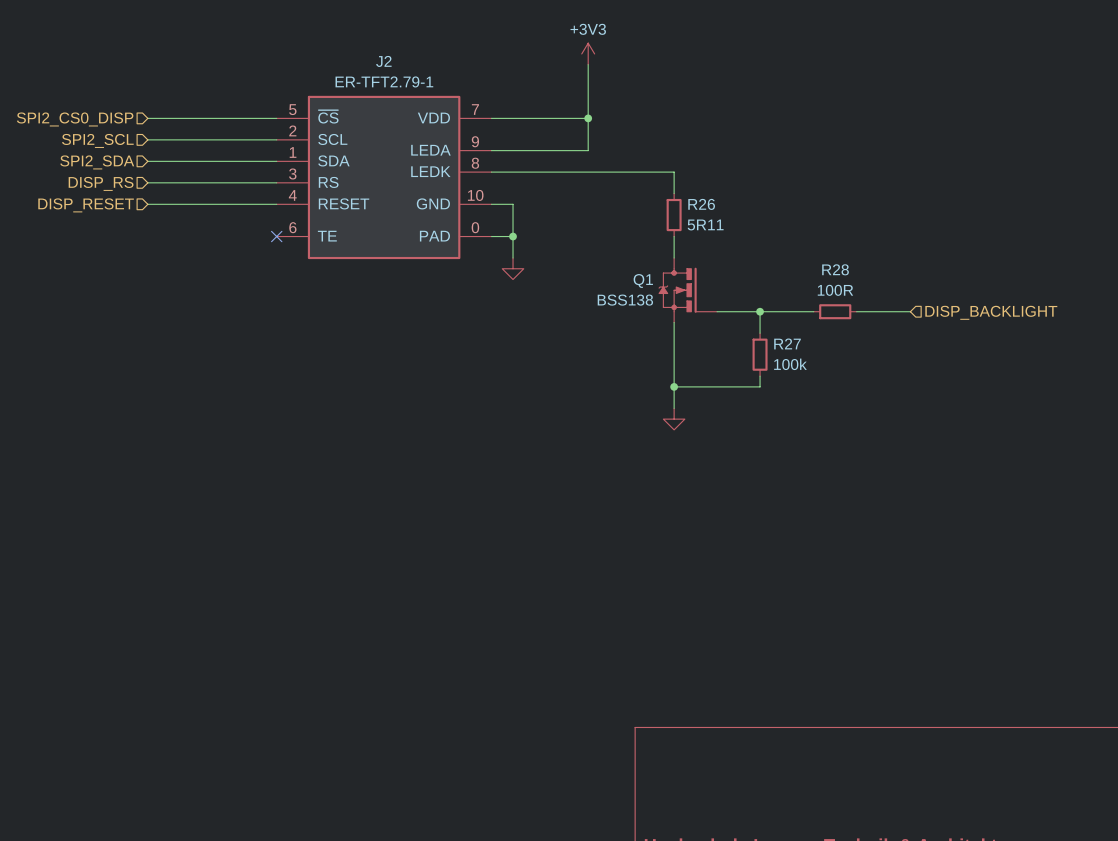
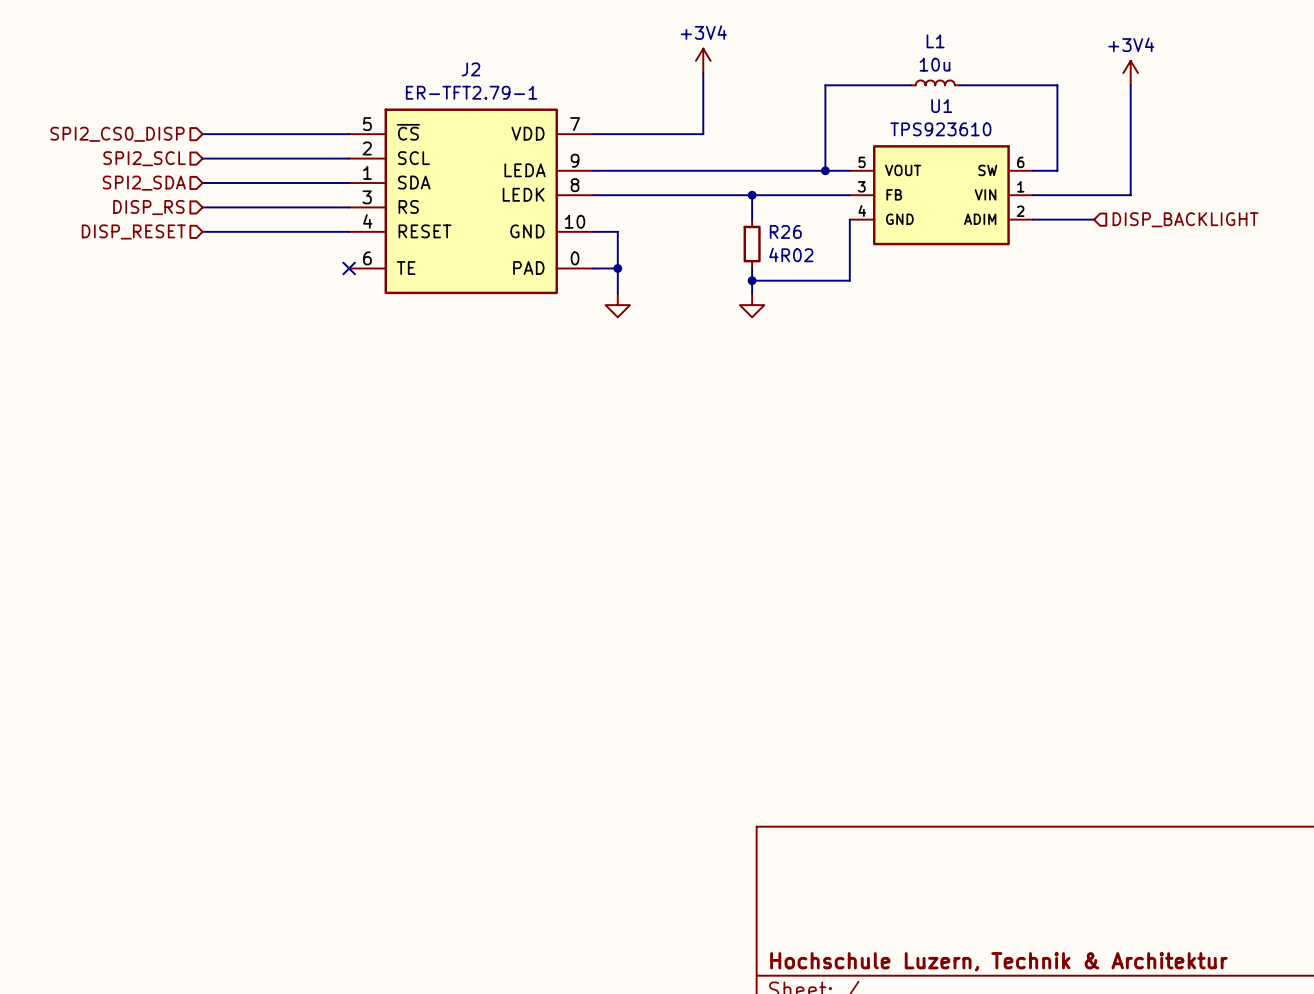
power symbol: +3V3 (588, 53) -> +3V4 (703, 60)
power symbol: none -> +3V4 (1130, 73)
L1: none -> 10u (935, 82)
wire: none -> (910, 85) (825, 85) (825, 170)
wire: none -> (959, 85) (1057, 85) (1057, 170) (1032, 170)
wire: none -> (1130, 85) (1130, 195) (1032, 195)
wire: (588, 118) (588, 150) -> (849, 170) (703, 170)
junction: (588, 118) -> none
junction: none -> (825, 170)
junction: none -> (752, 195)
wire: (674, 172) (674, 193) -> (800, 195) (849, 195)
U1: none -> TPS923610 (941, 195)
wire: none -> (849, 219) (849, 280) (752, 280)
R26 position: (674, 215) -> (752, 244)
R26 value: 5R11 (705, 224) -> 4R02 (791, 254)
wire: (674, 236) (674, 258) -> (752, 268) (752, 292)
junction: none -> (752, 280)
Q1: BSS138 (688, 290) -> none
wire: (717, 311) (813, 311) -> none
wire: (760, 311) (760, 333) -> (752, 195) (752, 219)
junction: (760, 311) -> none
R28: 100R (835, 311) -> none
wire: (856, 311) (910, 311) -> (1032, 219) (1094, 219)
hierarchical label position: DISP_BACKLIGHT (991, 312) -> DISP_BACKLIGHT (1185, 219)
wire: (674, 322) (674, 408) -> none
R27: 100k (760, 354) -> none
wire: (760, 376) (760, 386) (674, 386) -> none
junction: (674, 386) -> none
power symbol position: (674, 419) -> (752, 305)

